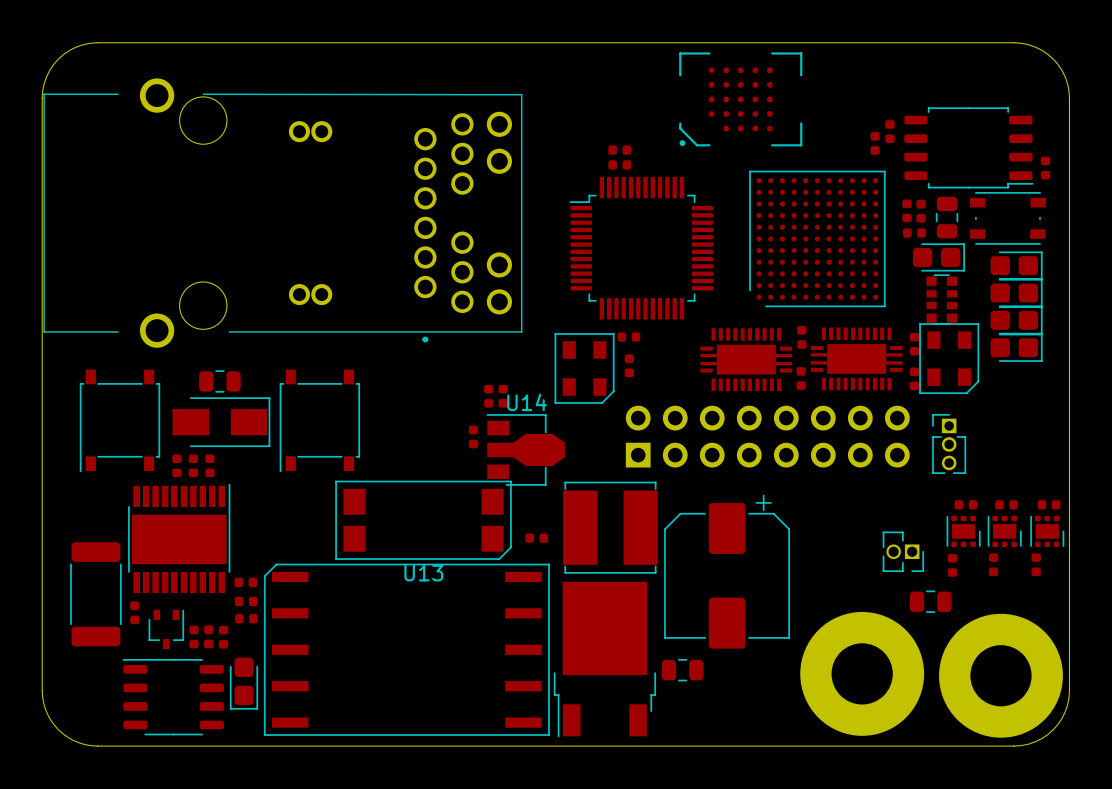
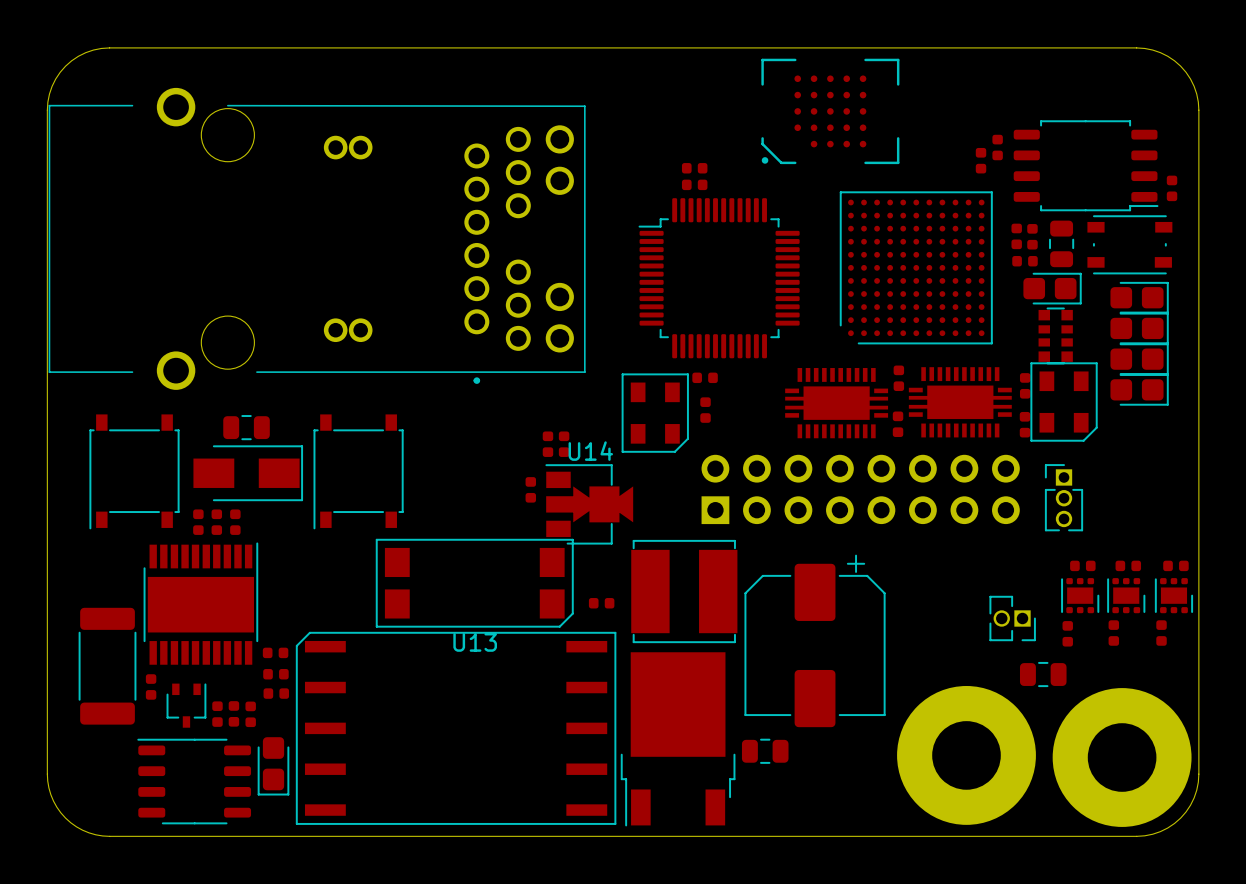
U14 footprint: [486, 414, 565, 486] -> [545, 464, 634, 545]

